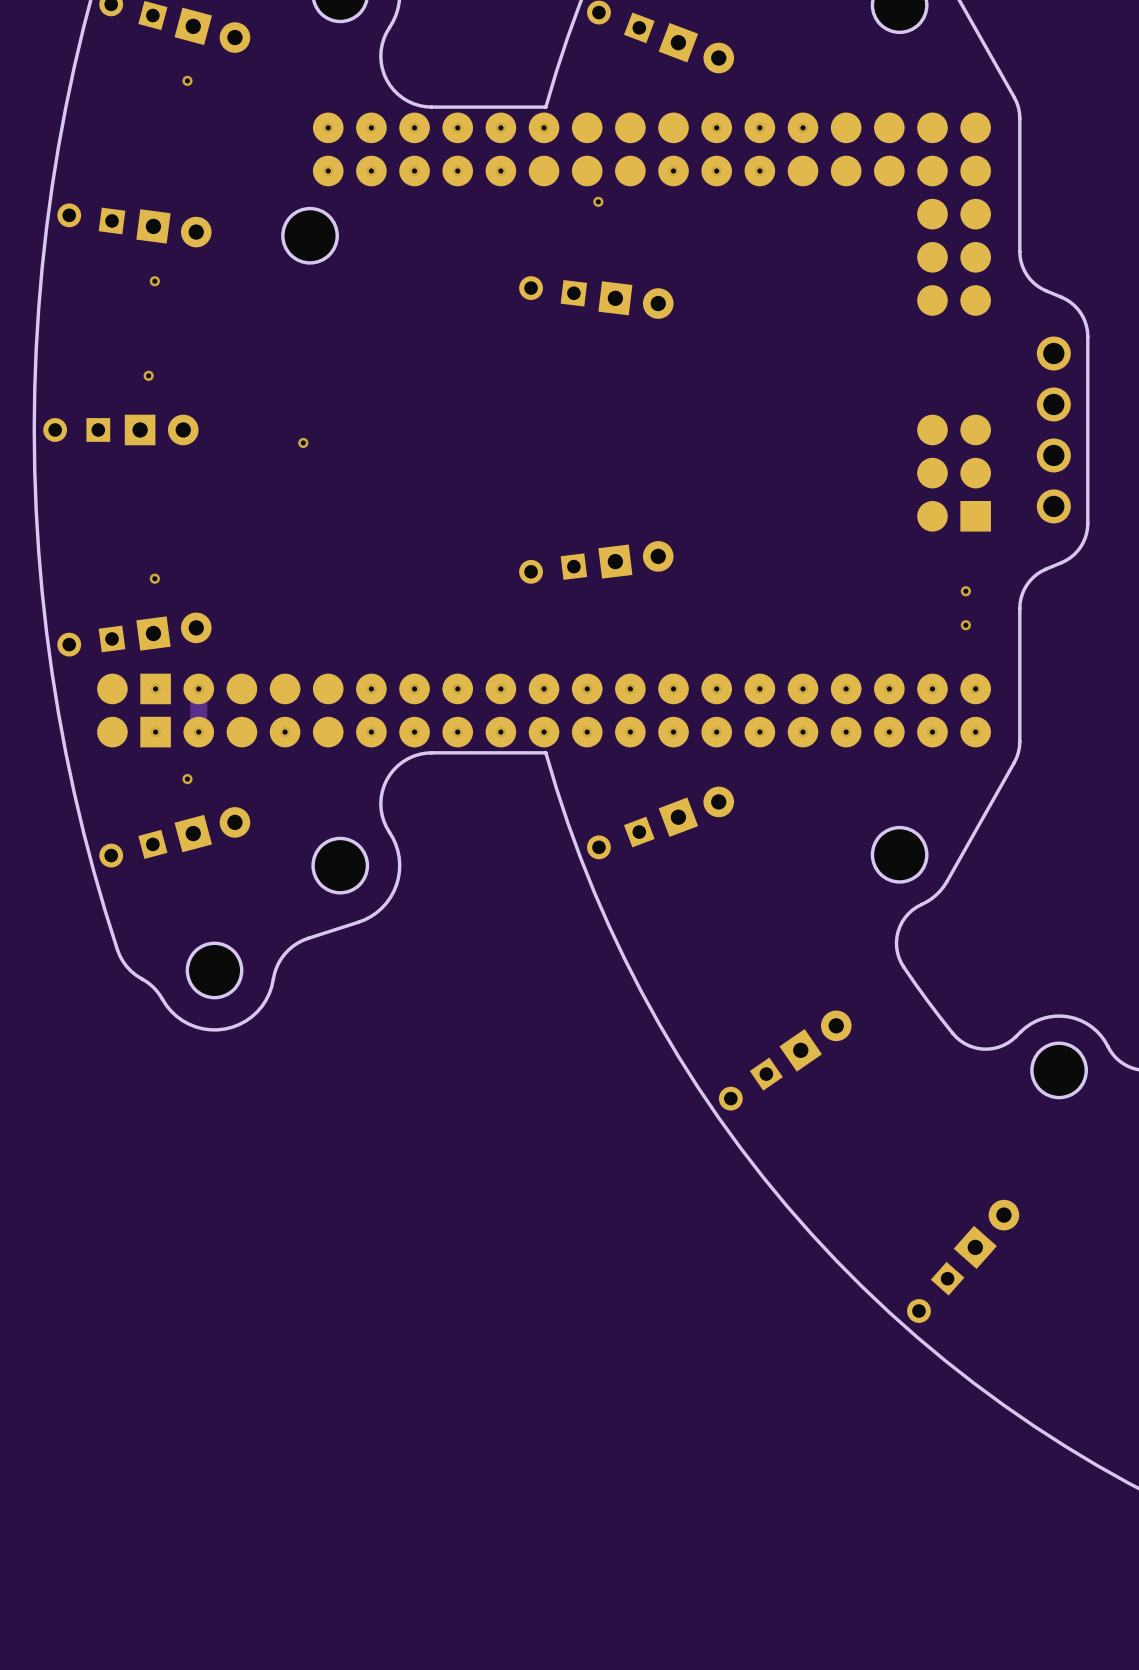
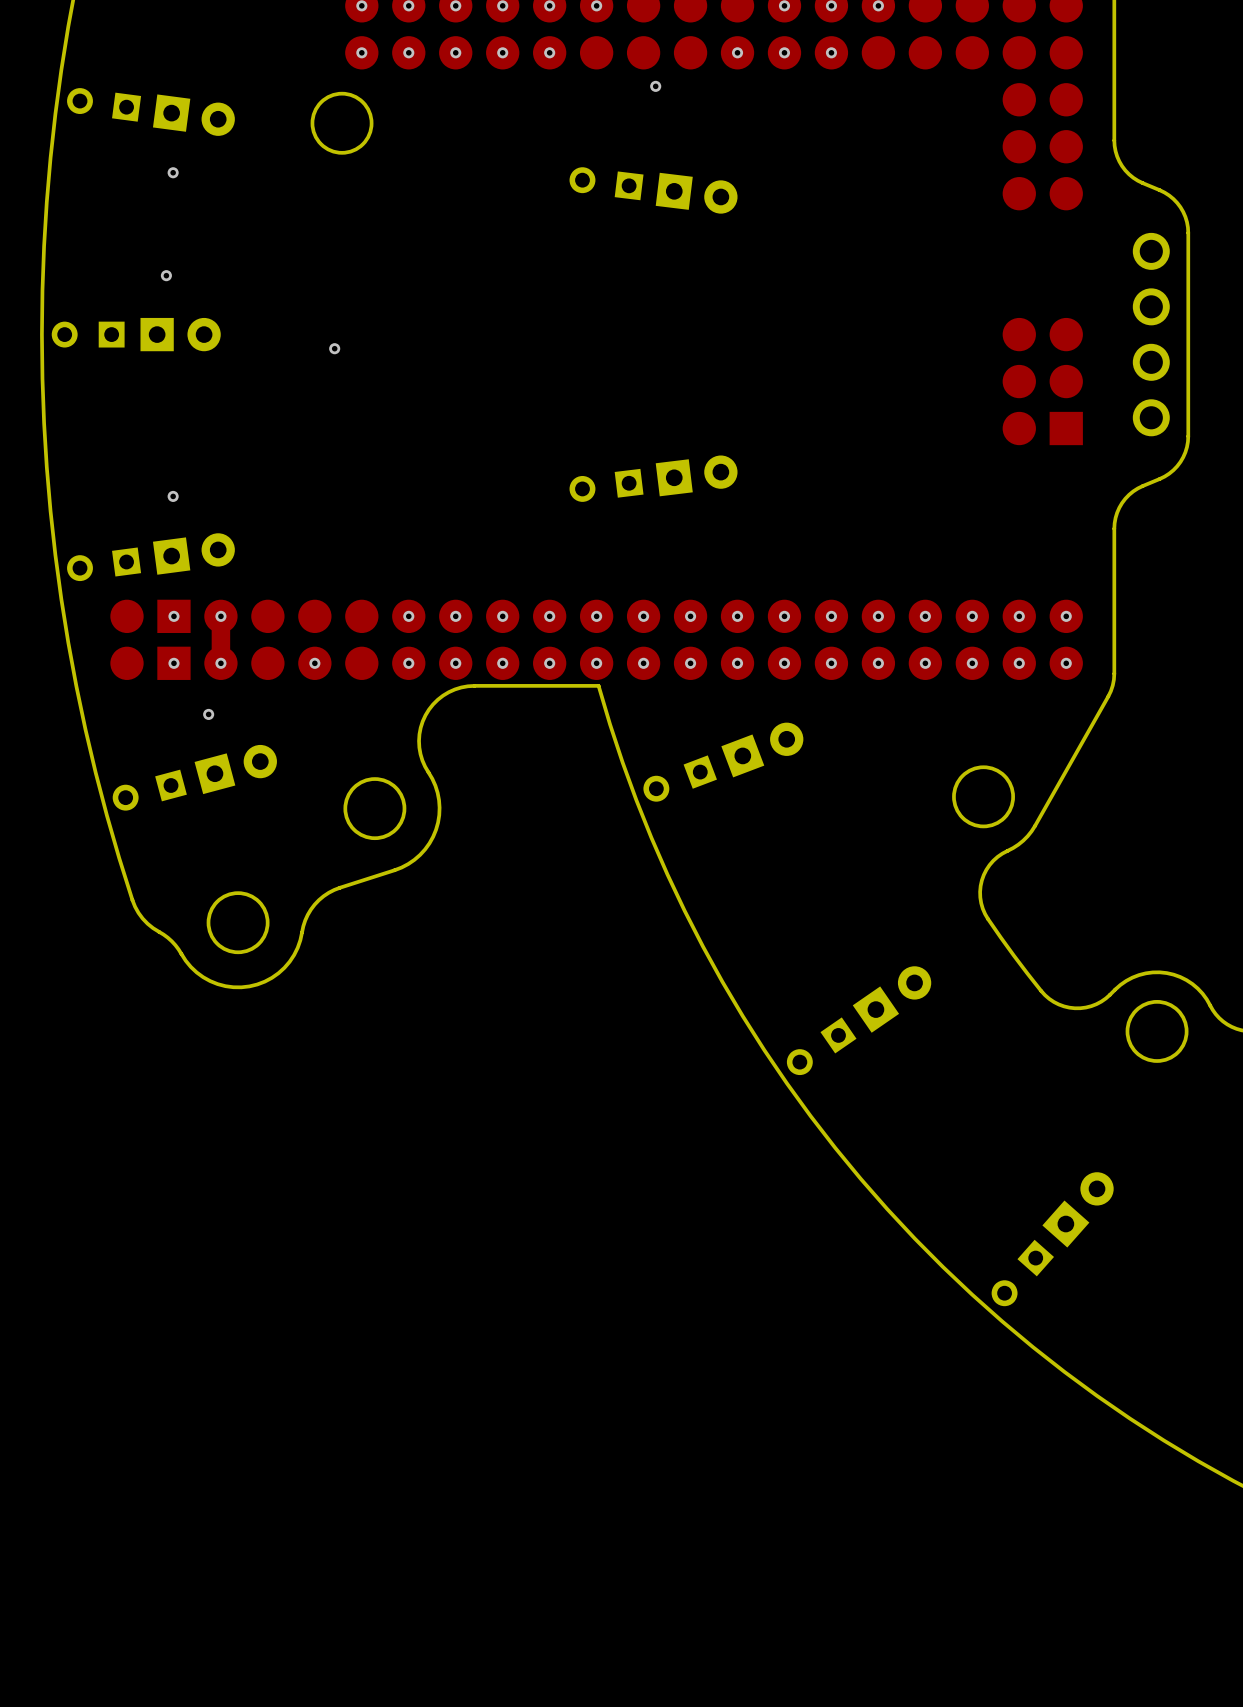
via: (965, 591) -> none
via: (965, 625) -> none

